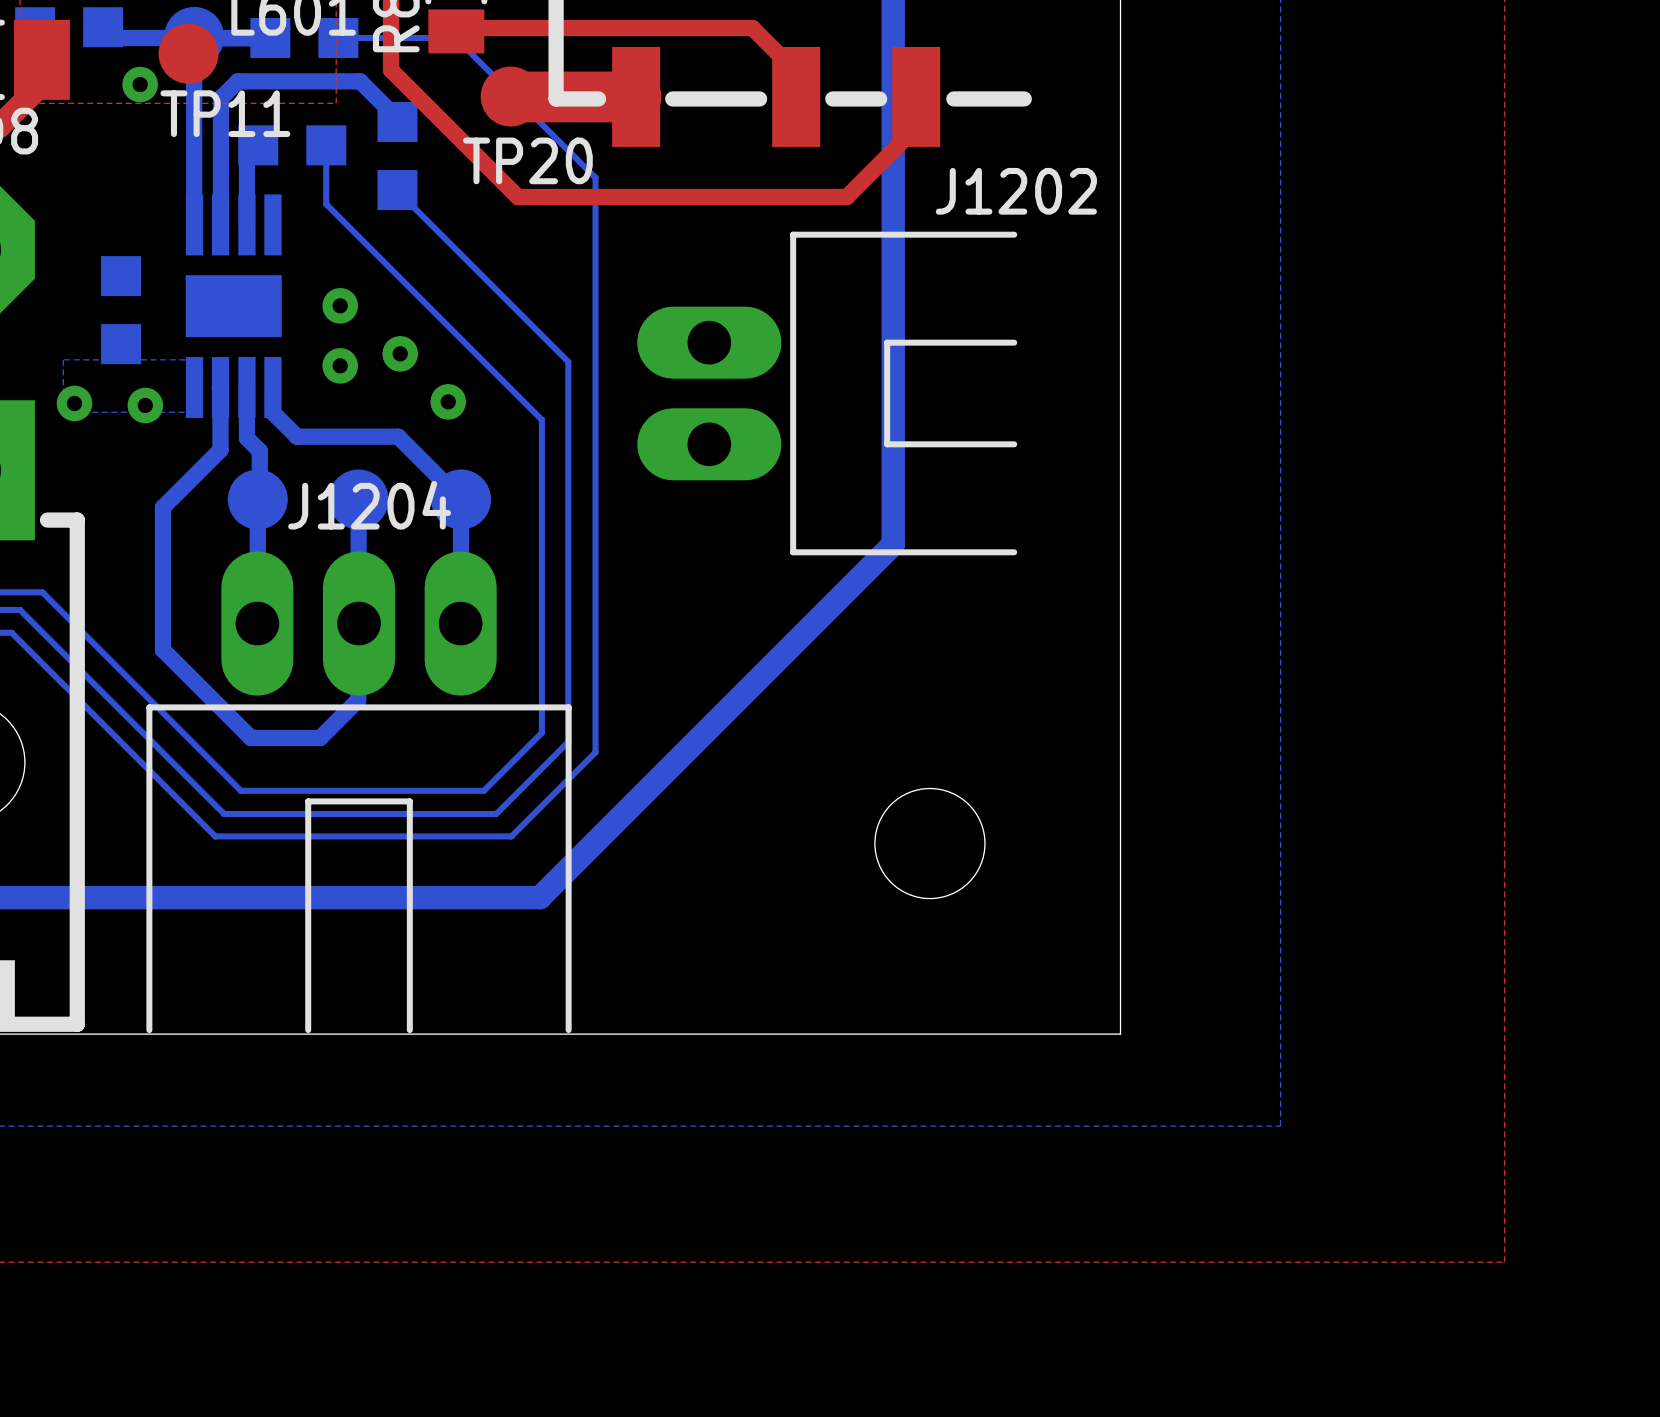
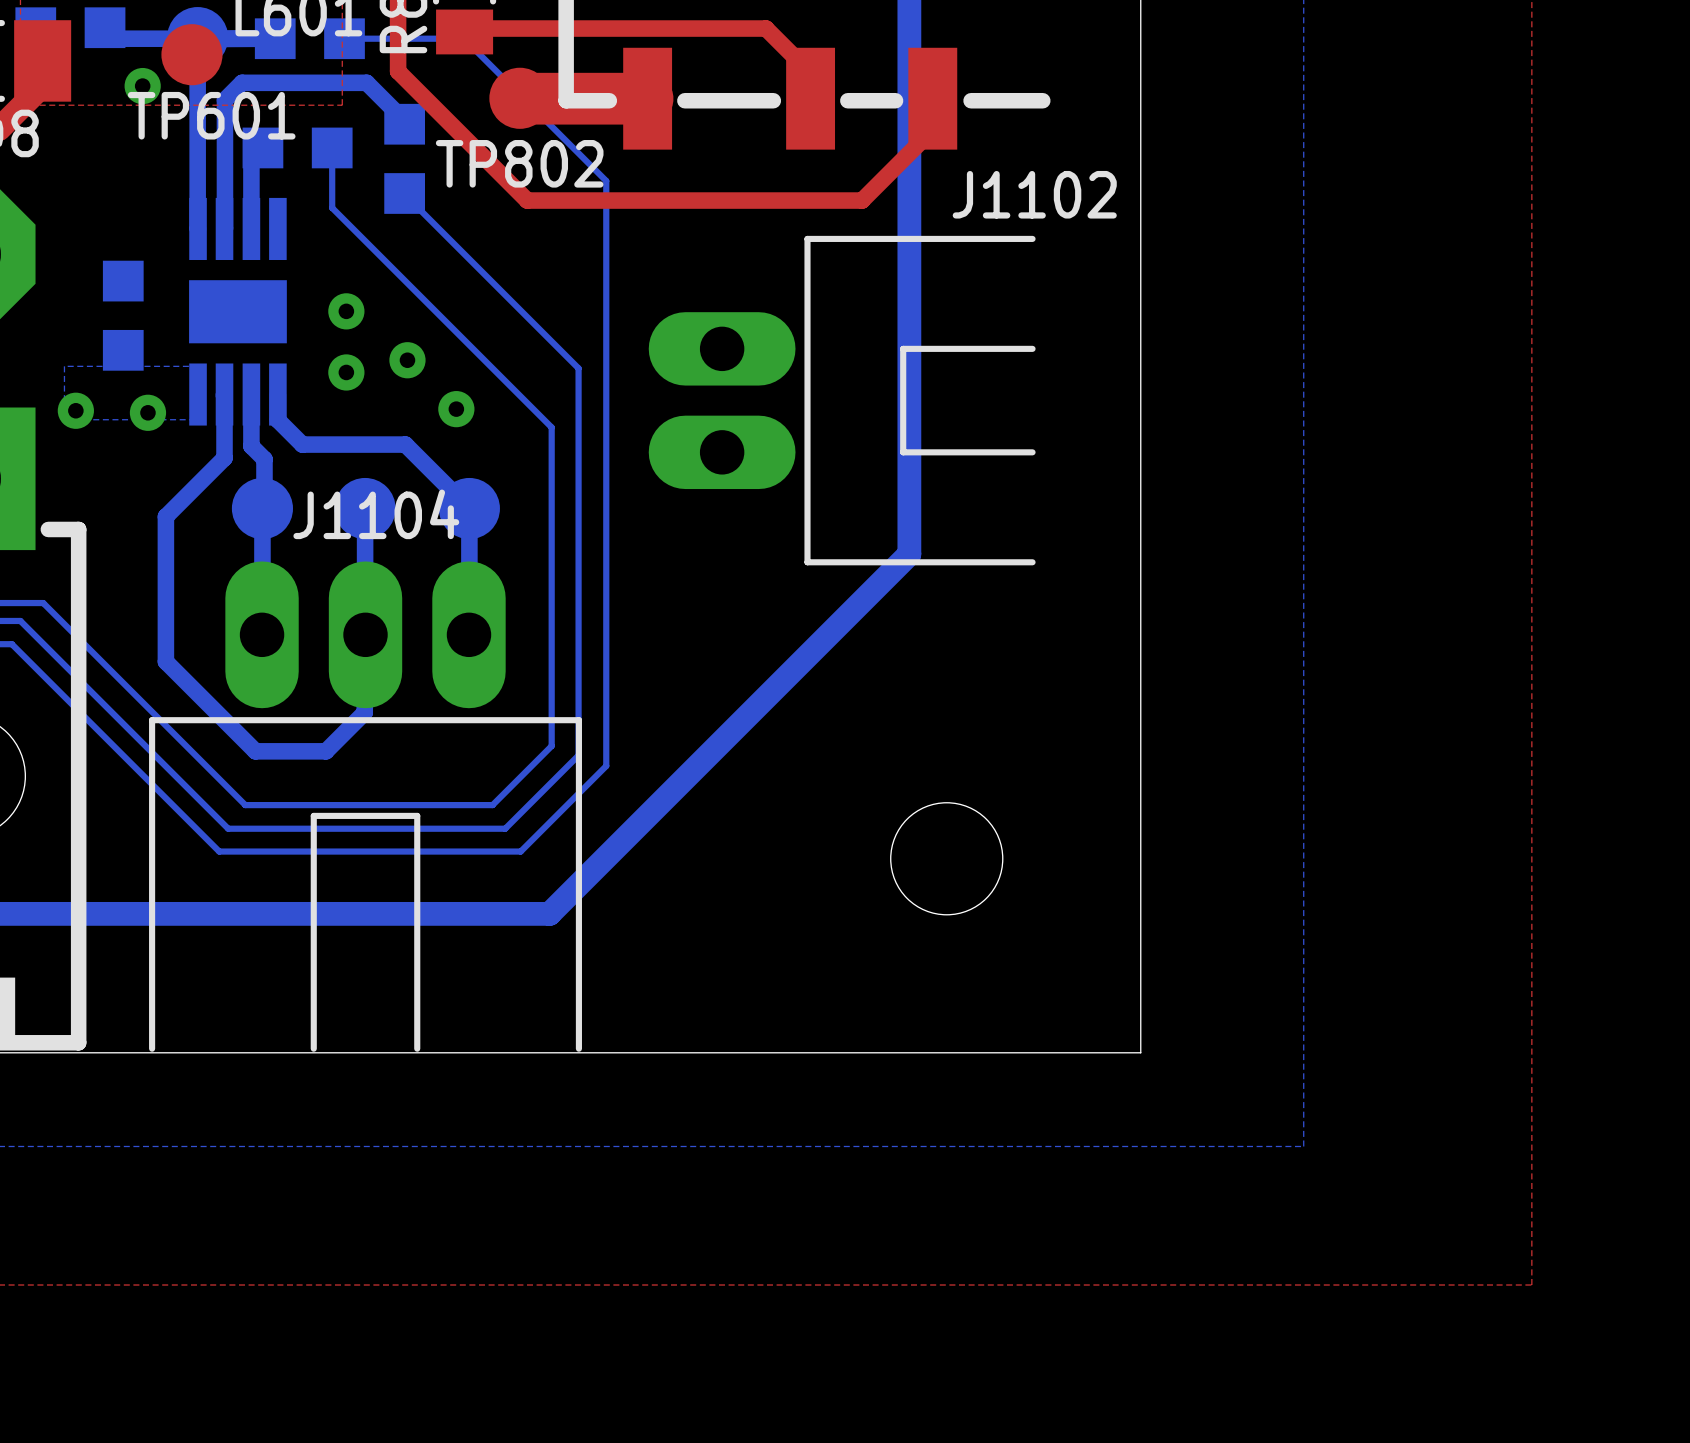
TP11 name: TP11 (225, 113) -> TP601 (211, 115)
TP20 name: TP20 (527, 160) -> TP802 (519, 163)
J1202 name: J1202 (1016, 191) -> J1102 (1034, 194)
J1204 name: J1204 (369, 505) -> J1104 (376, 514)

